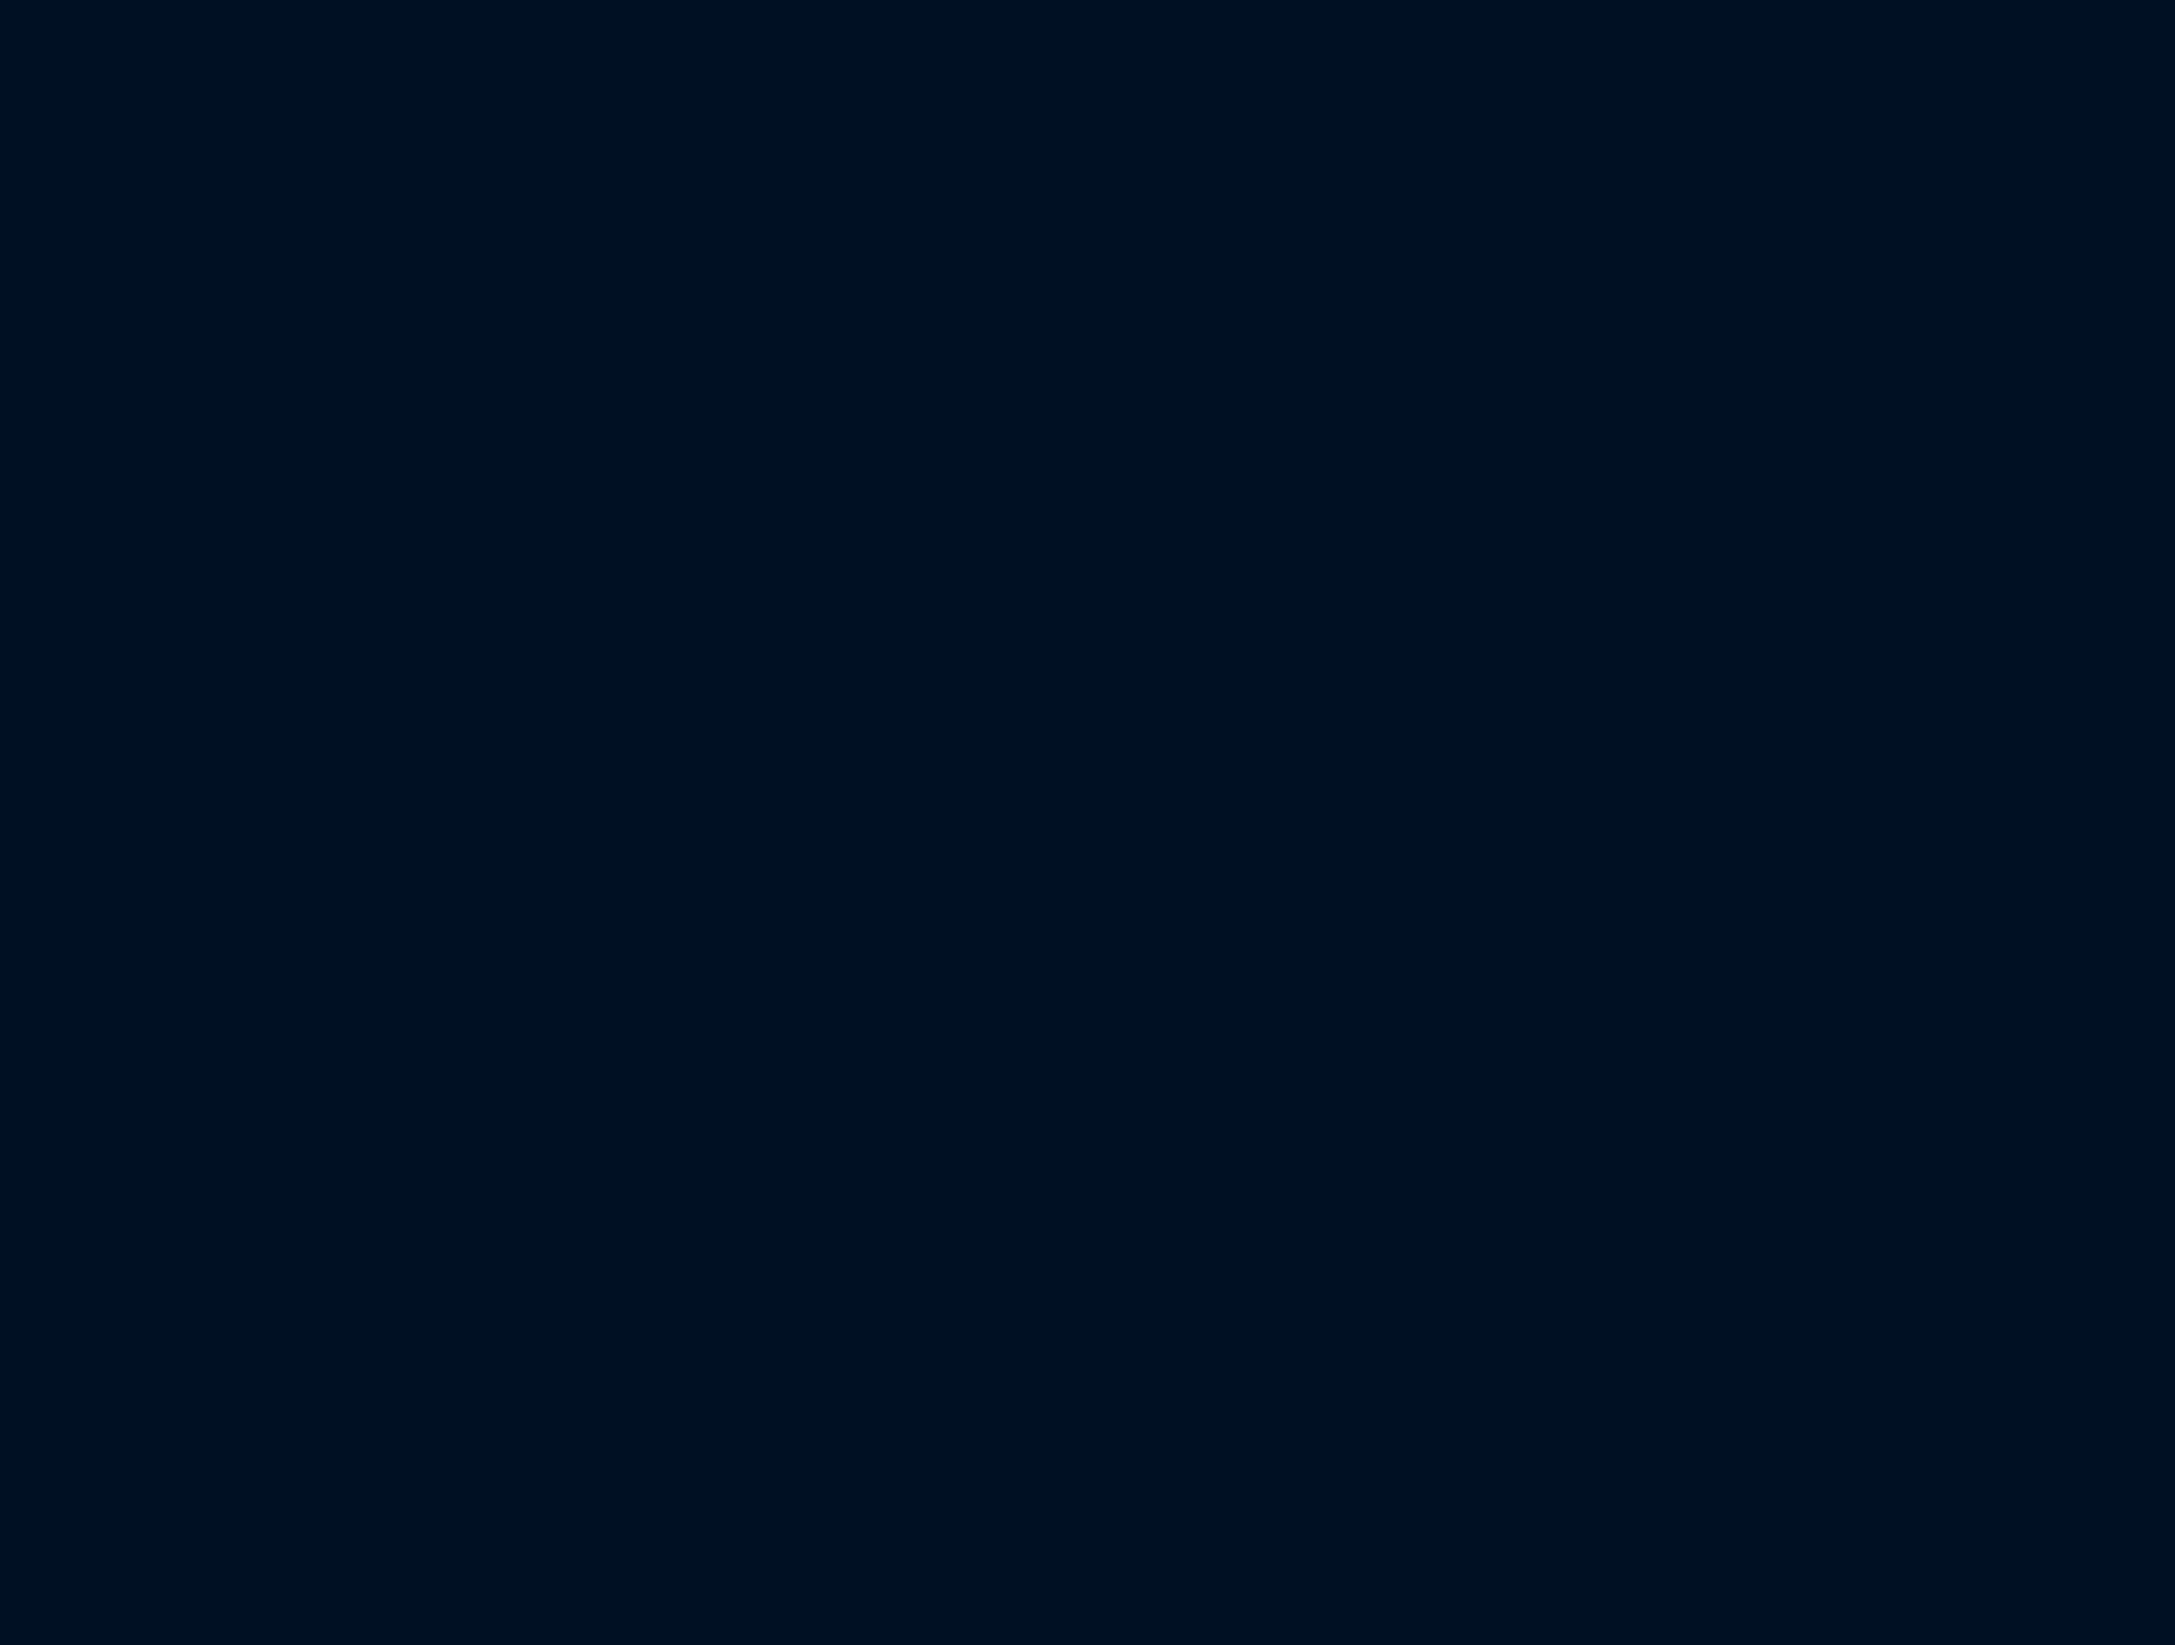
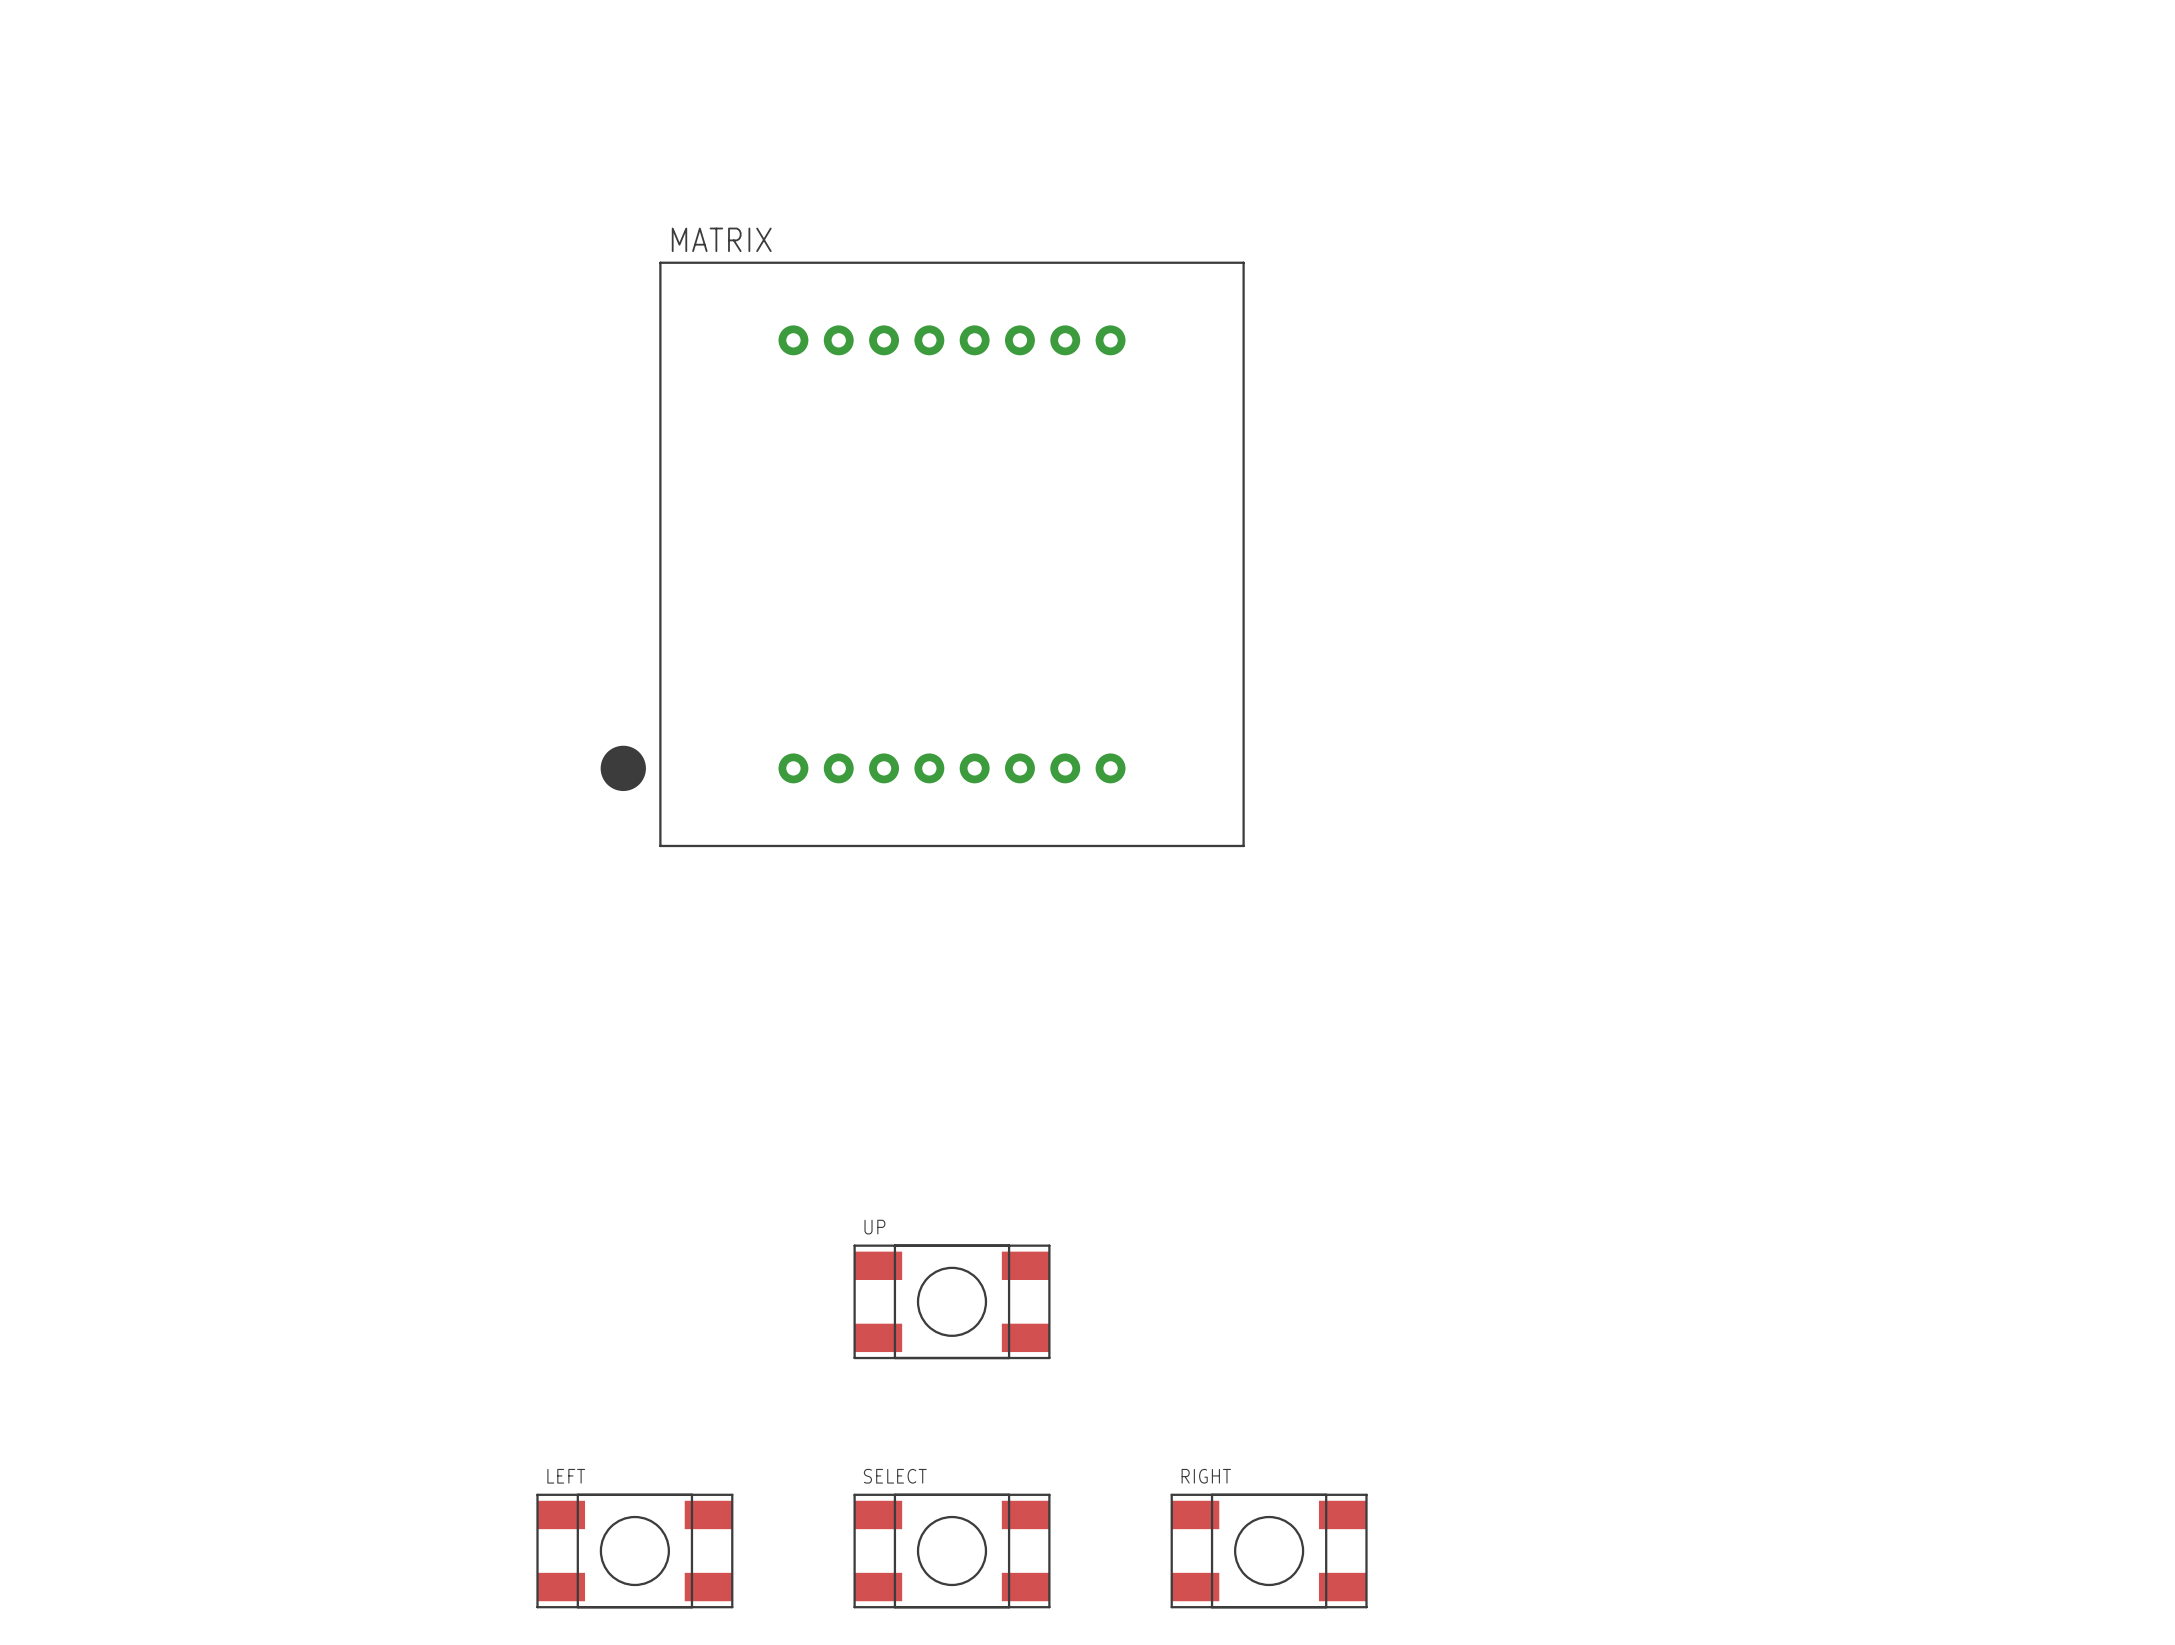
MATRIX: none -> (922, 554)
UP: none -> (952, 1301)
LEFT: none -> (634, 1551)
SELECT: none -> (952, 1551)
RIGHT: none -> (1269, 1551)

